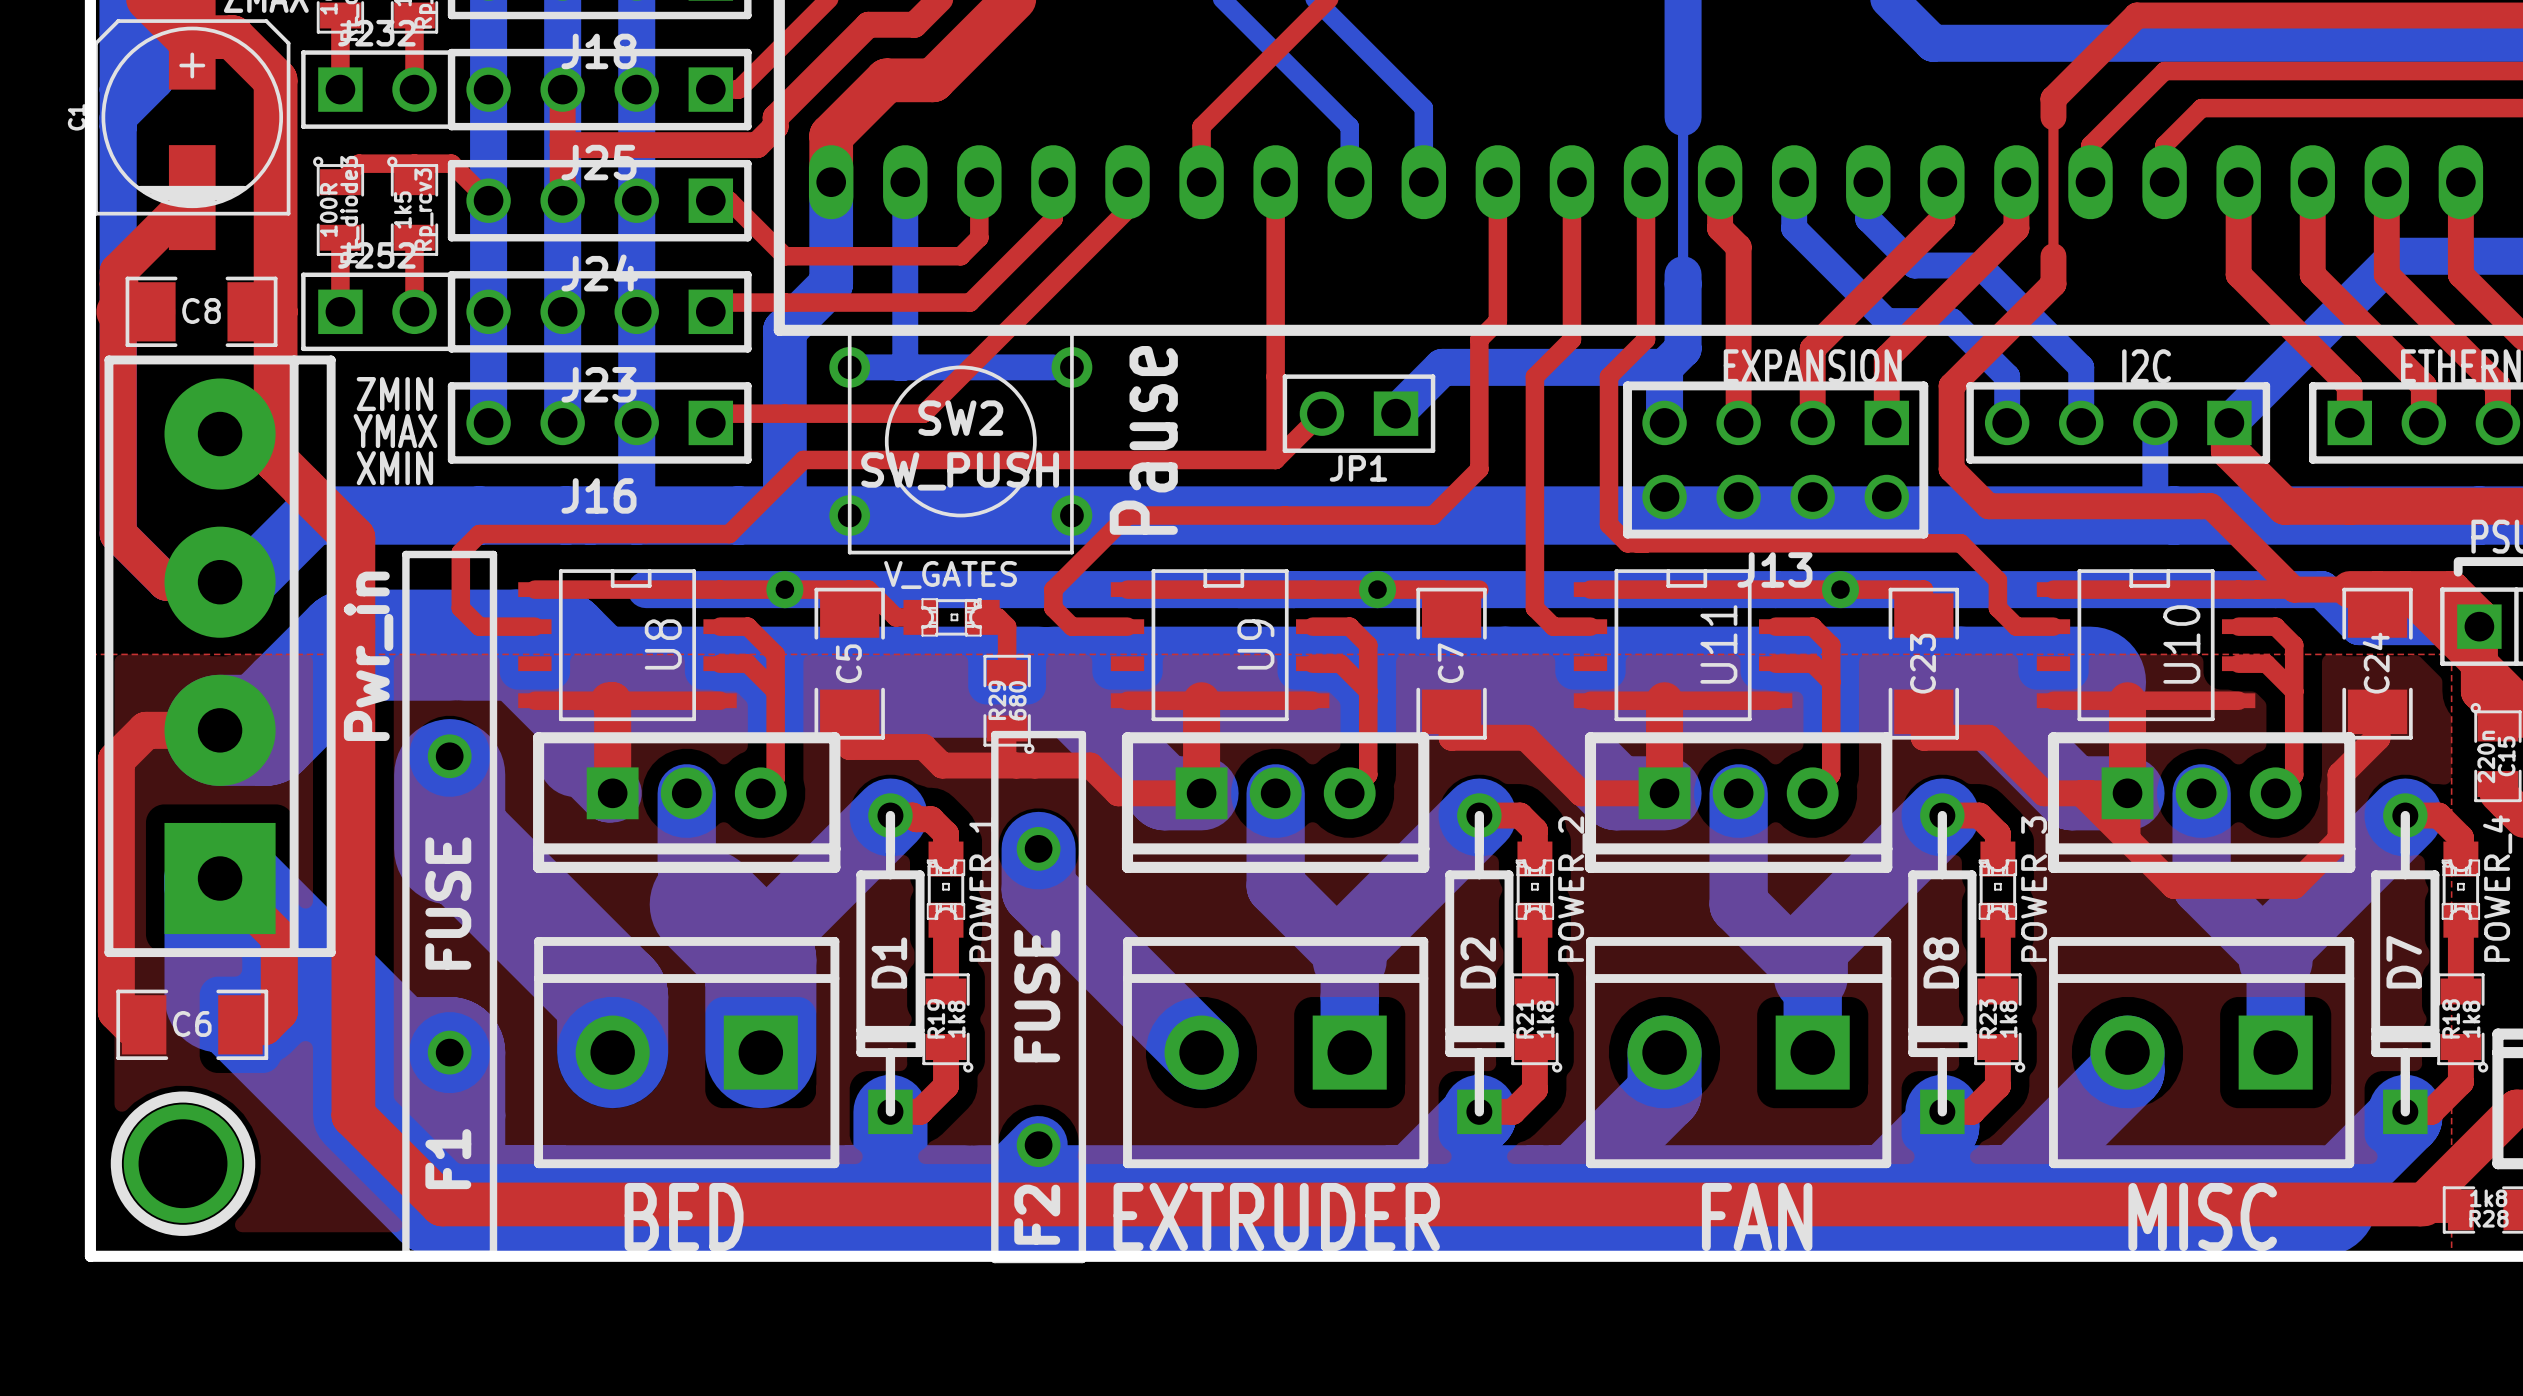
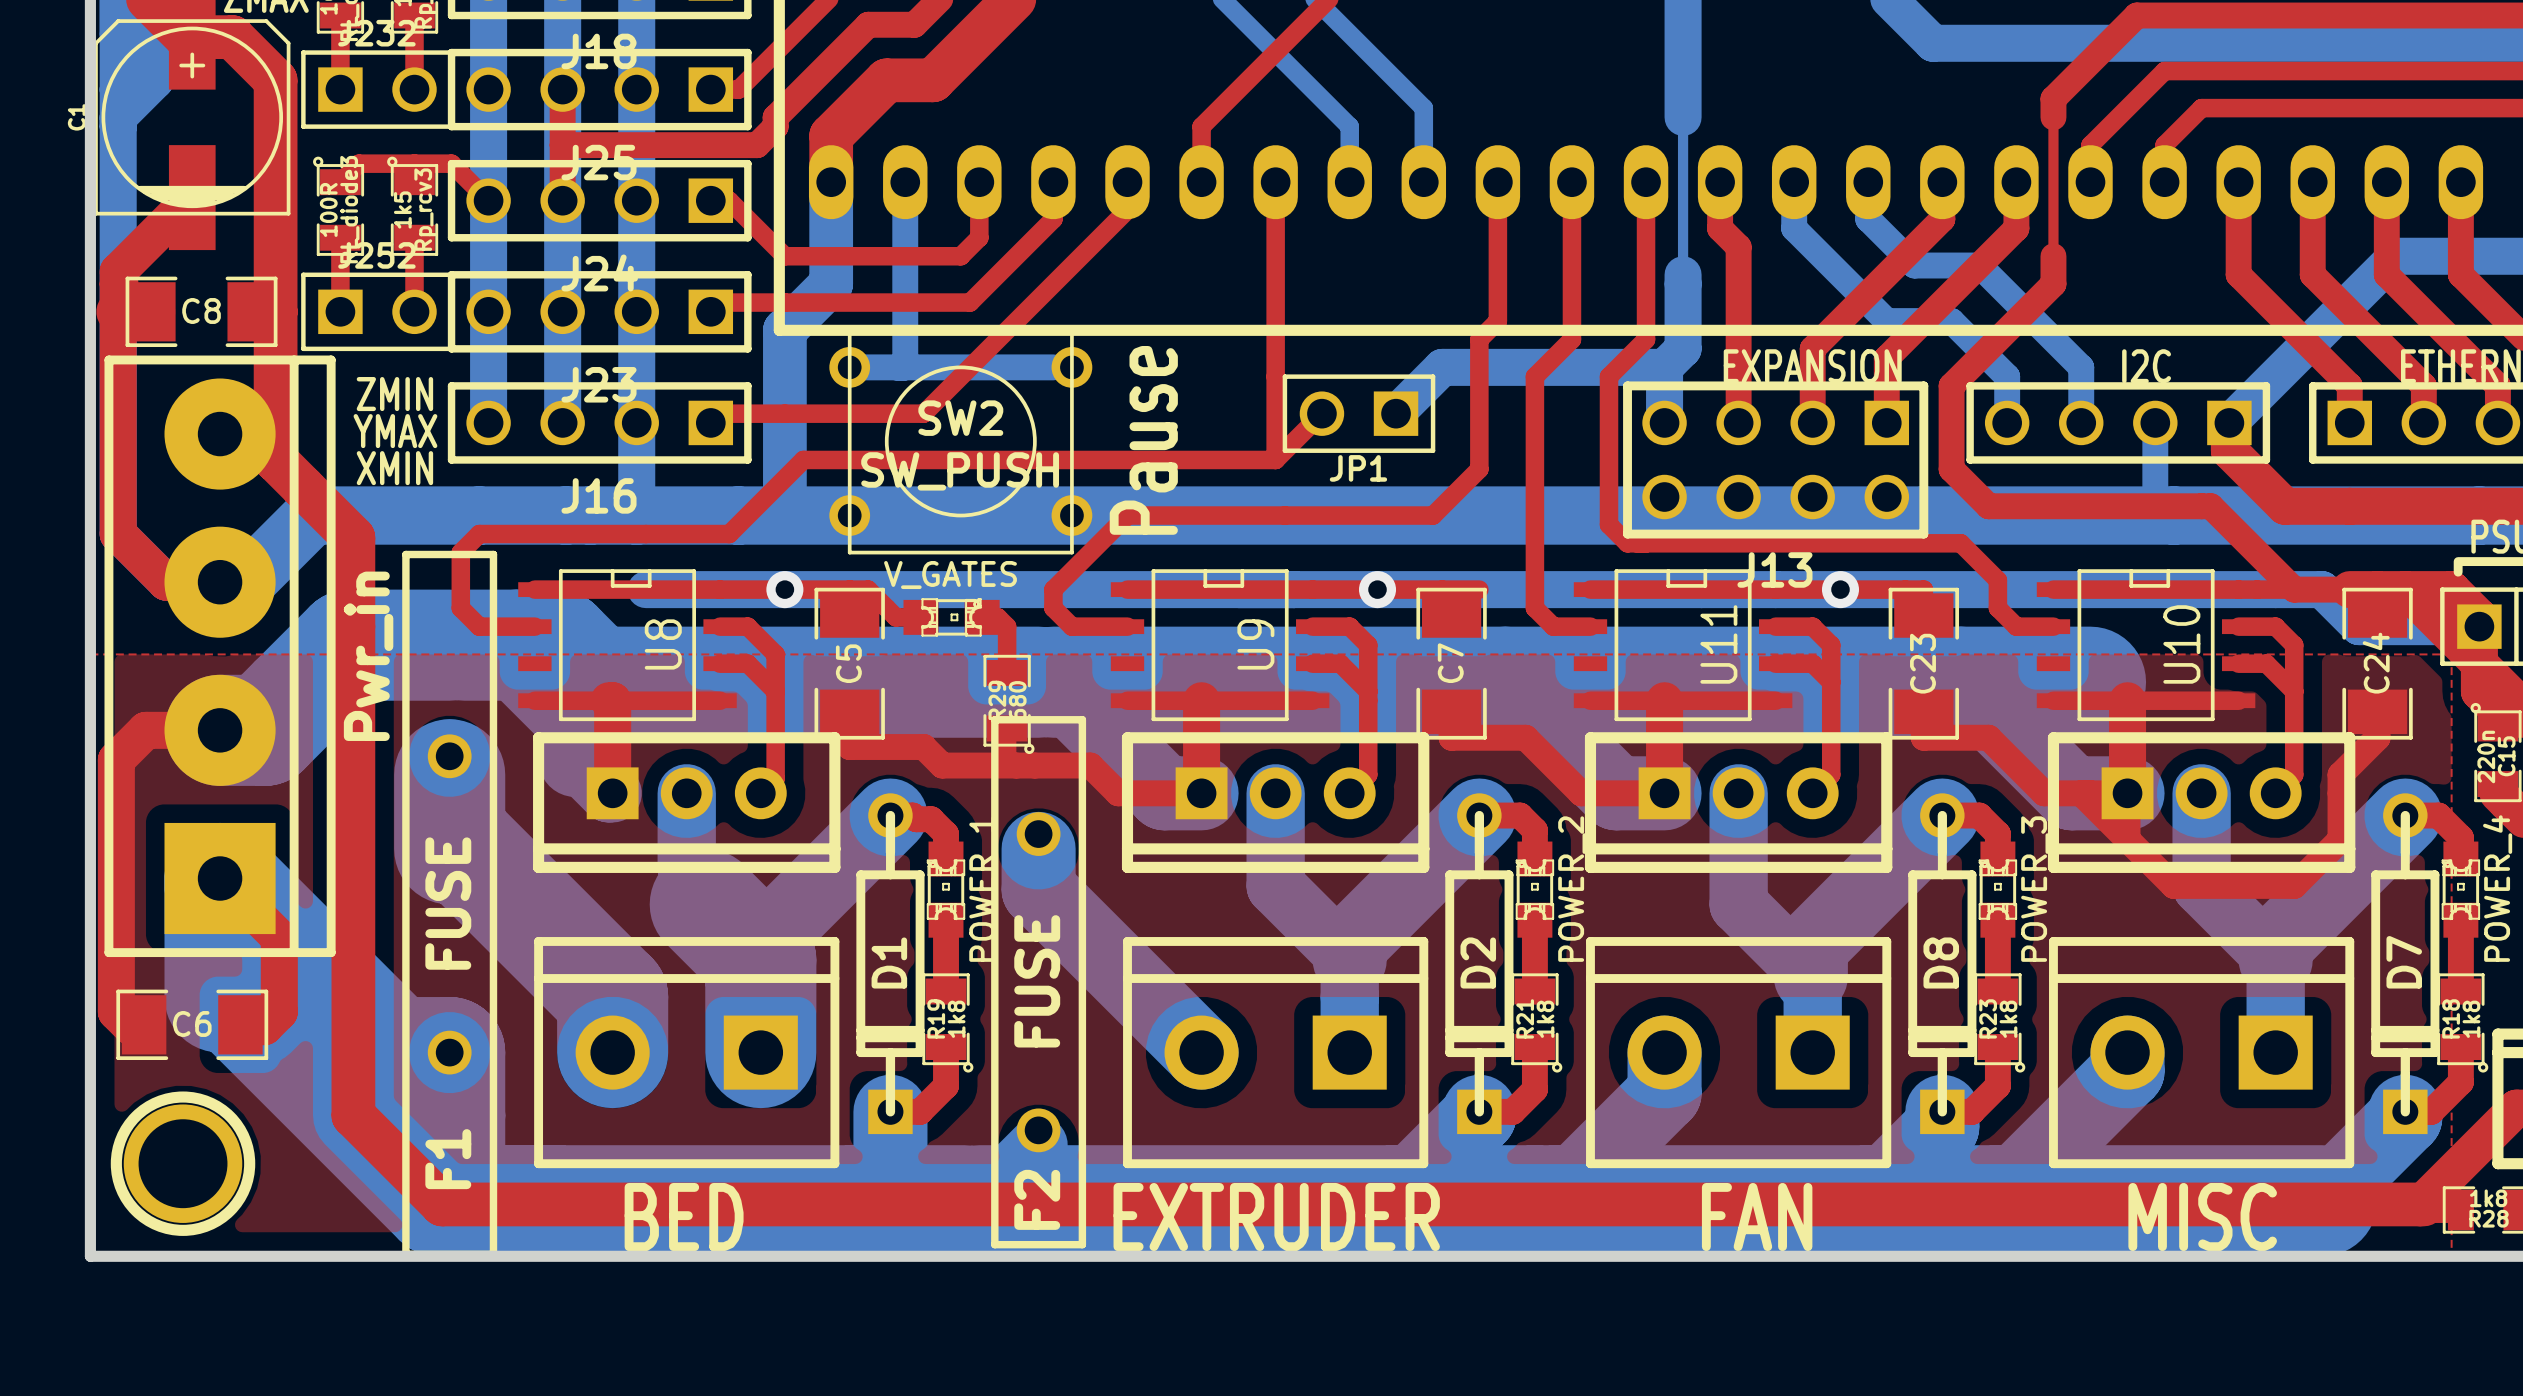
F2 position: (1038, 997) -> (1038, 982)

